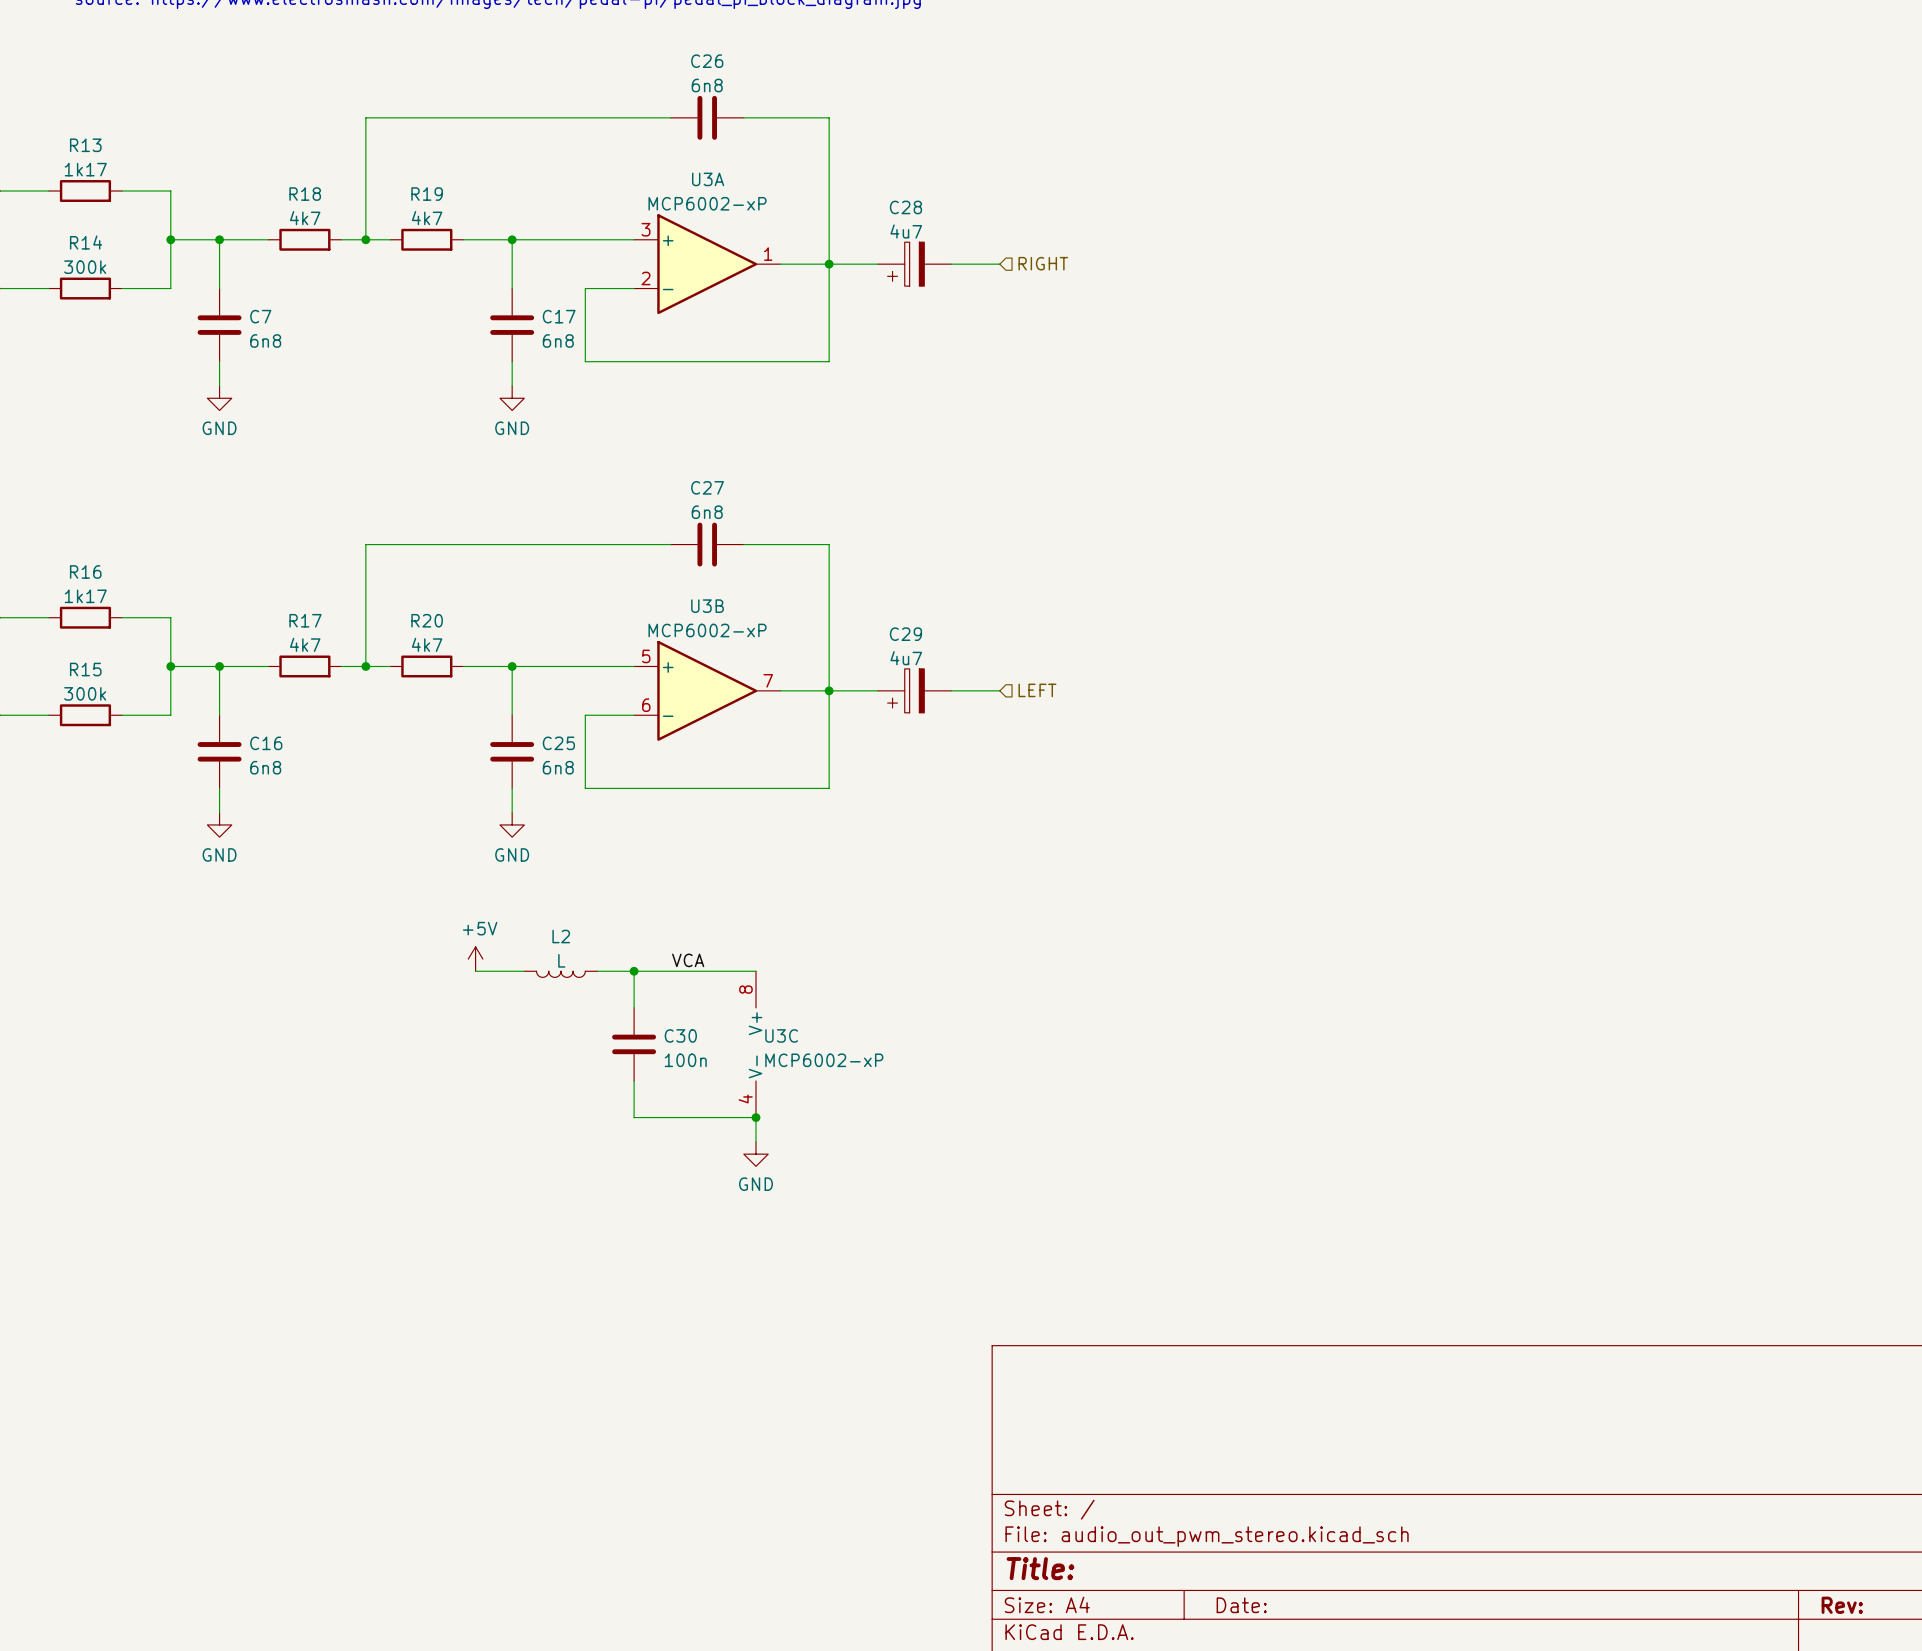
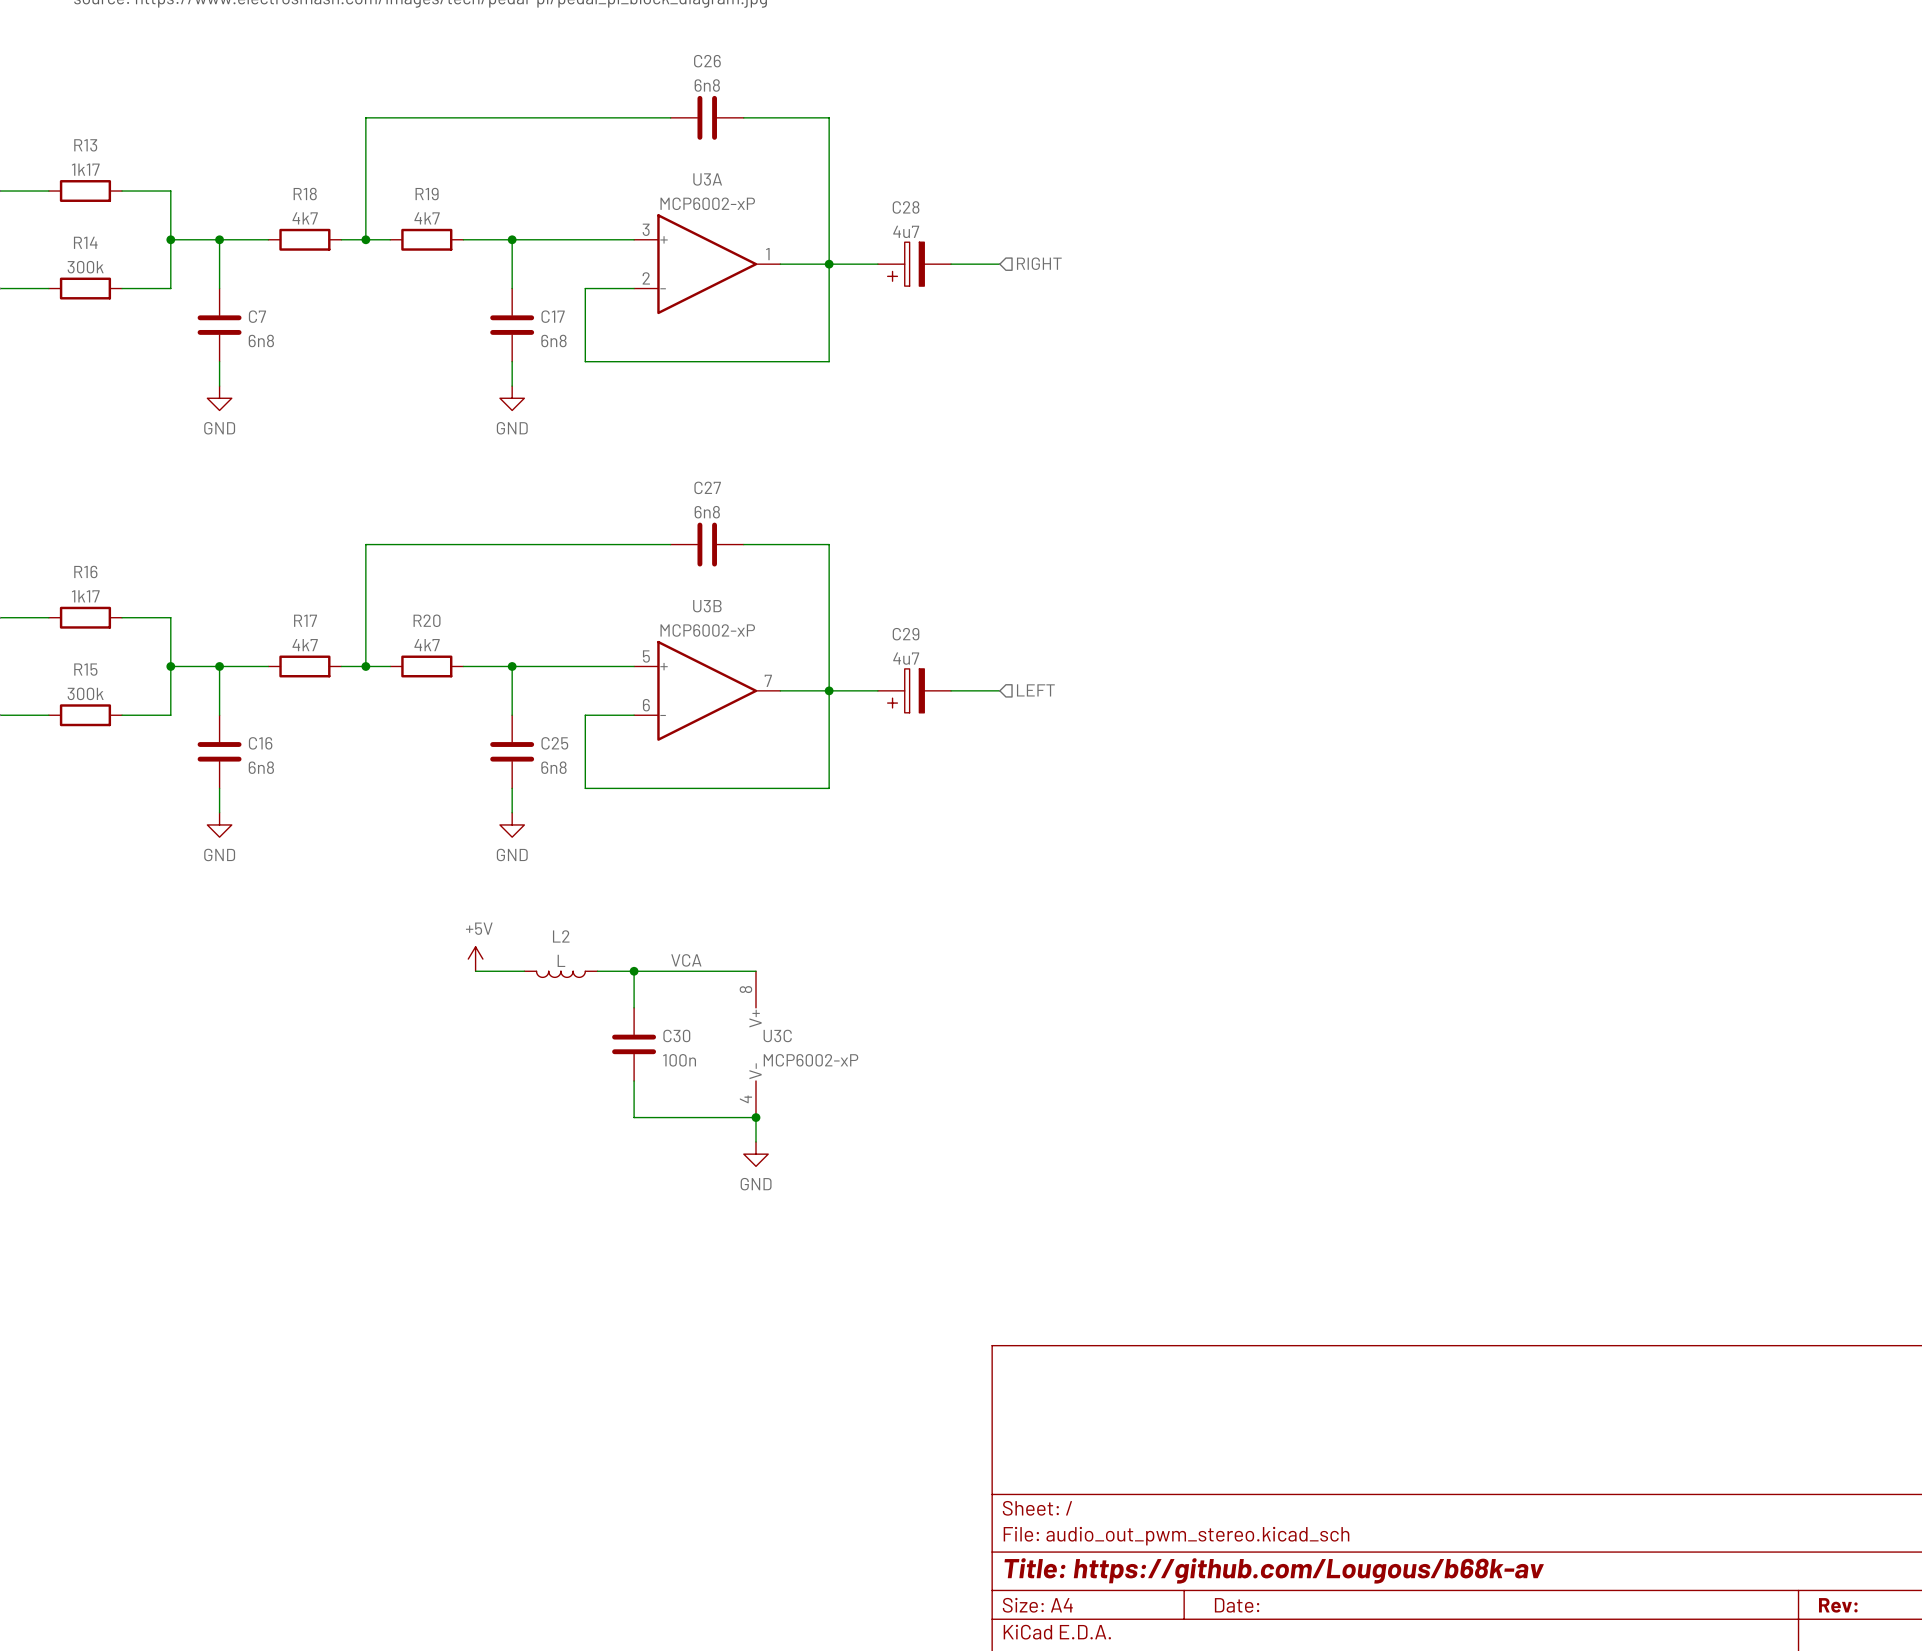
title block: Title: (1040, 1568) -> Title: https://github.com/Lougous/b68k-av (1274, 1570)

